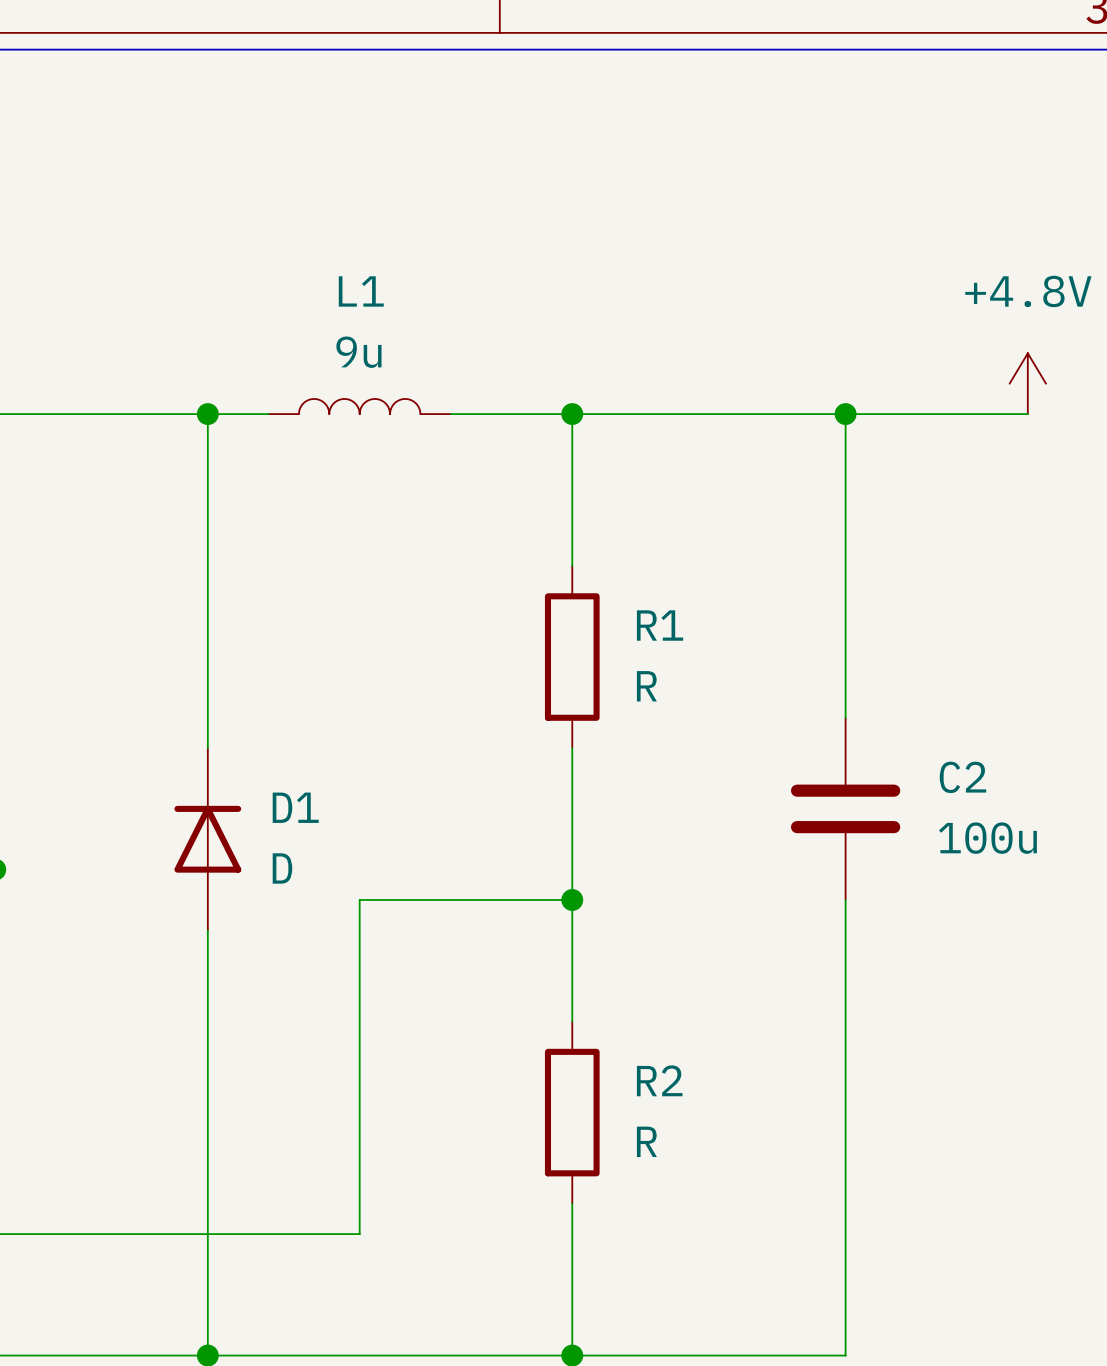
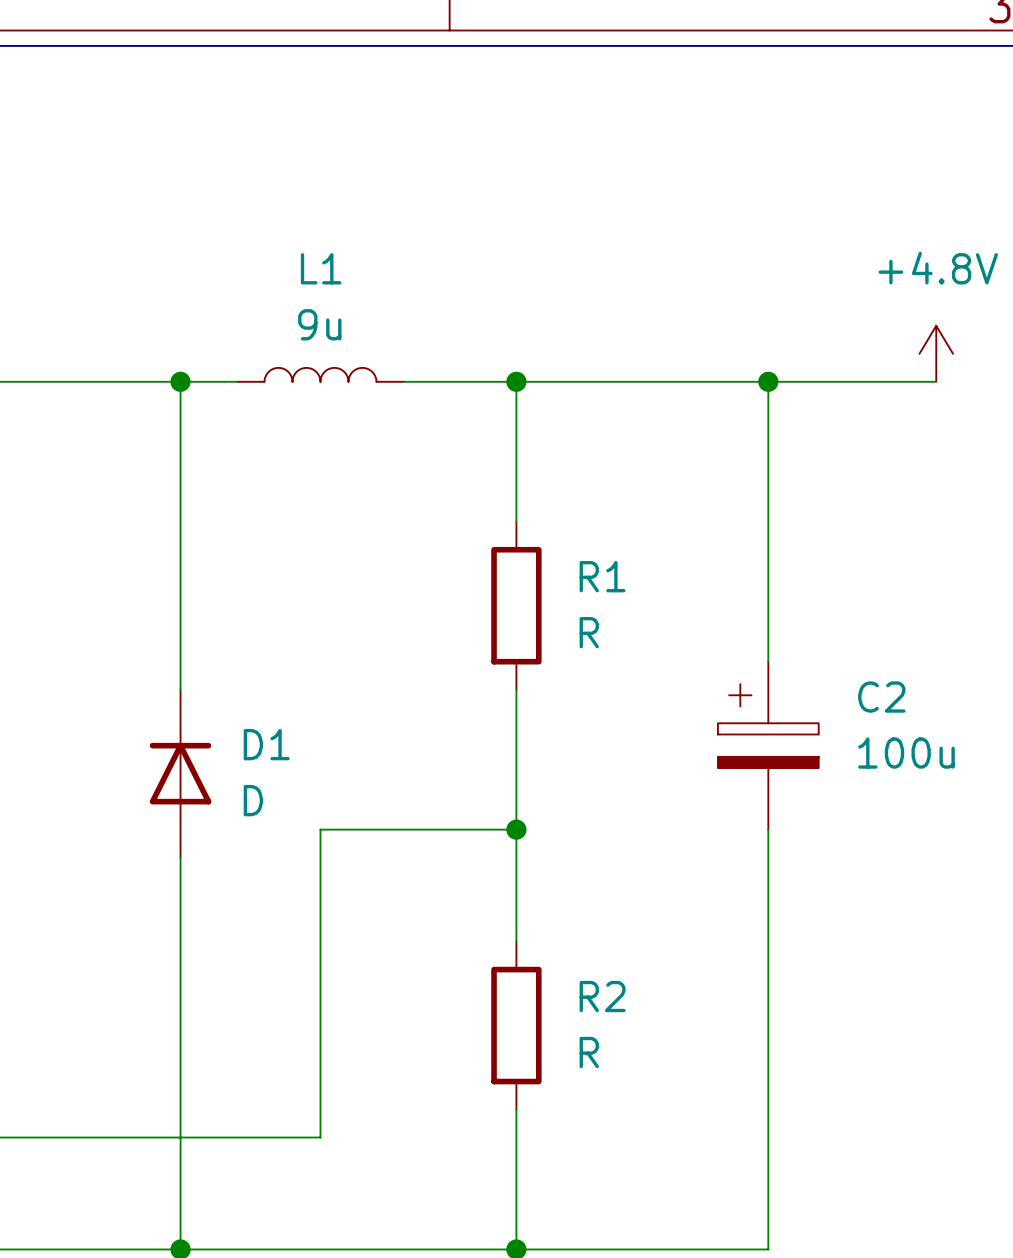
C2 symbol: [790, 717, 901, 901] -> [717, 661, 819, 830]

